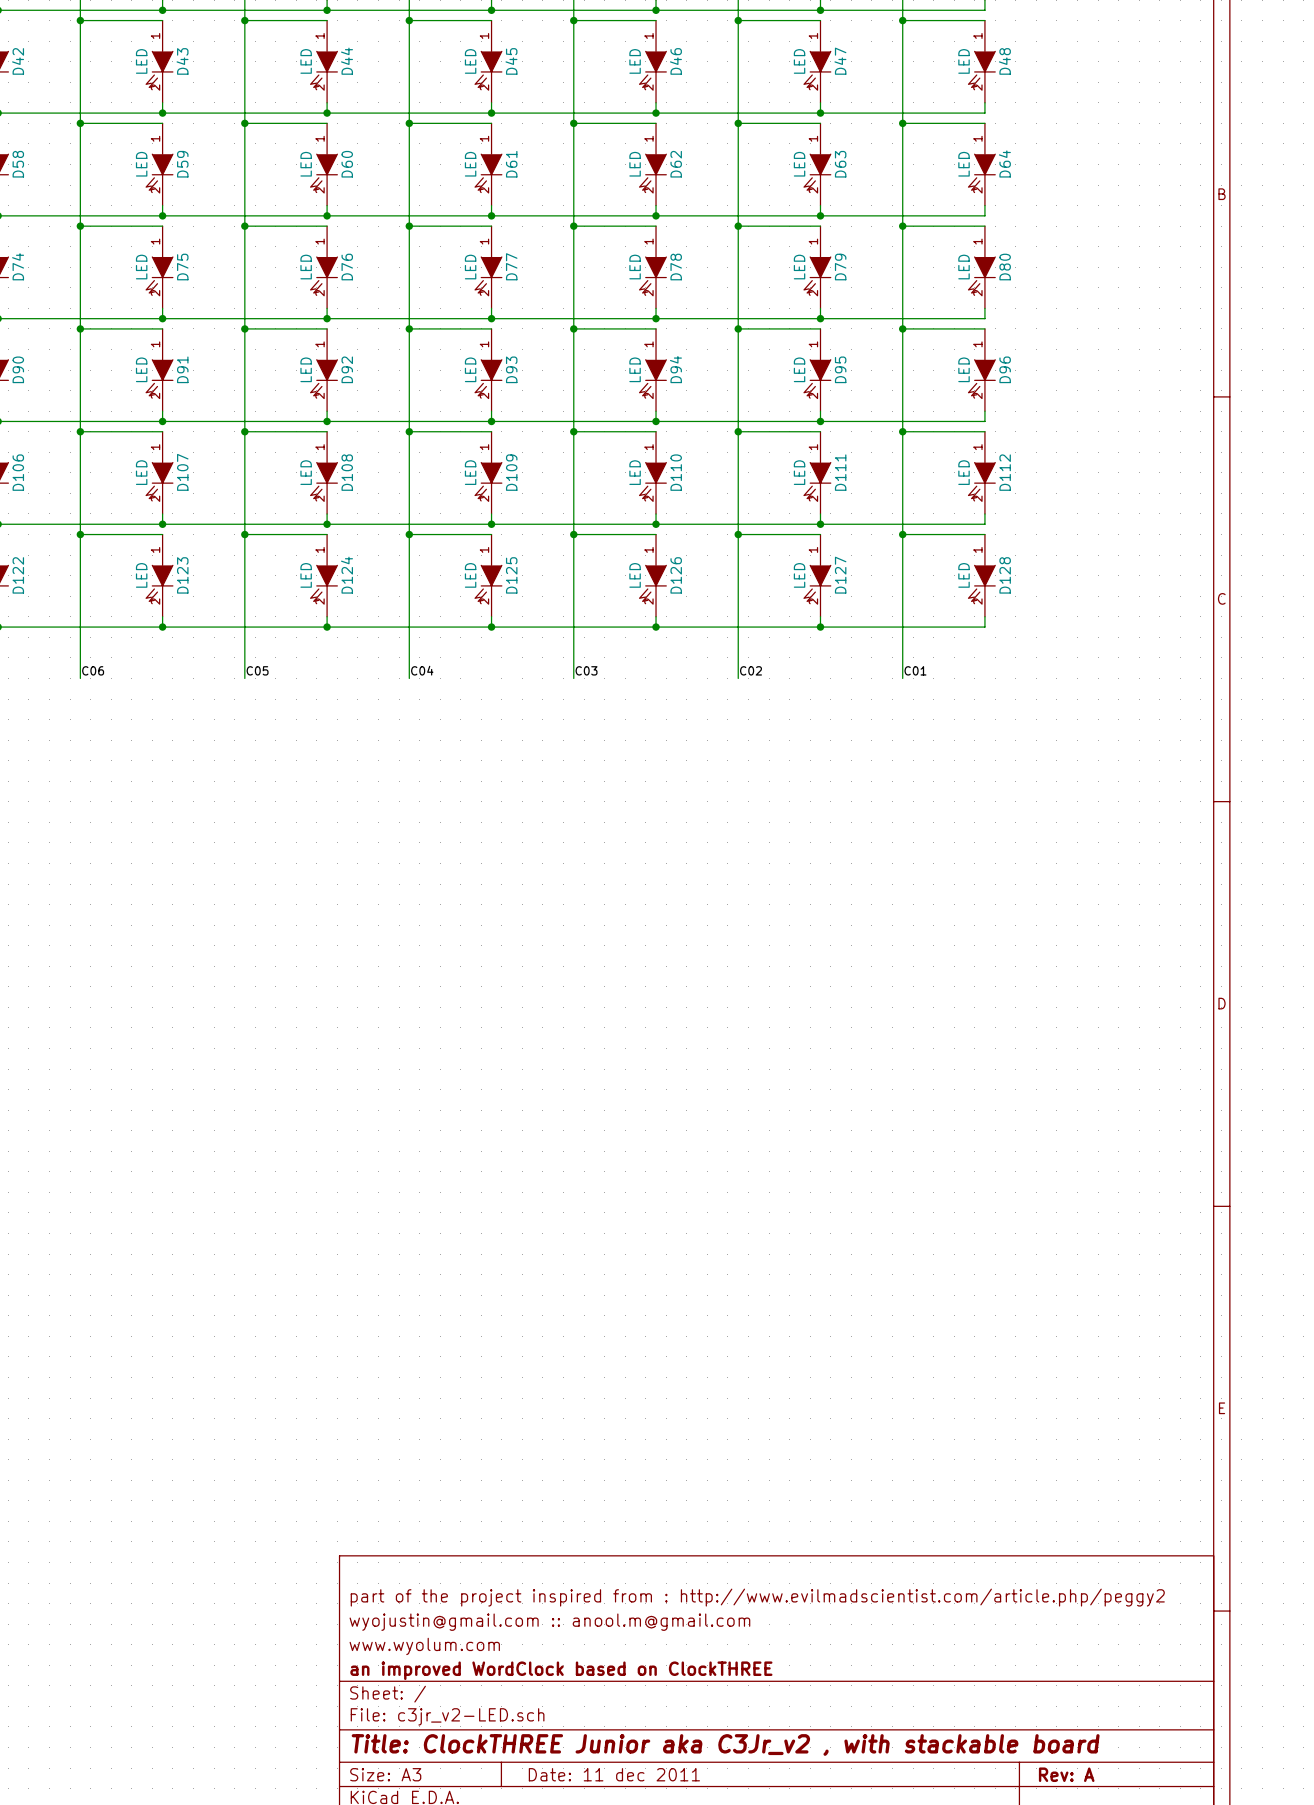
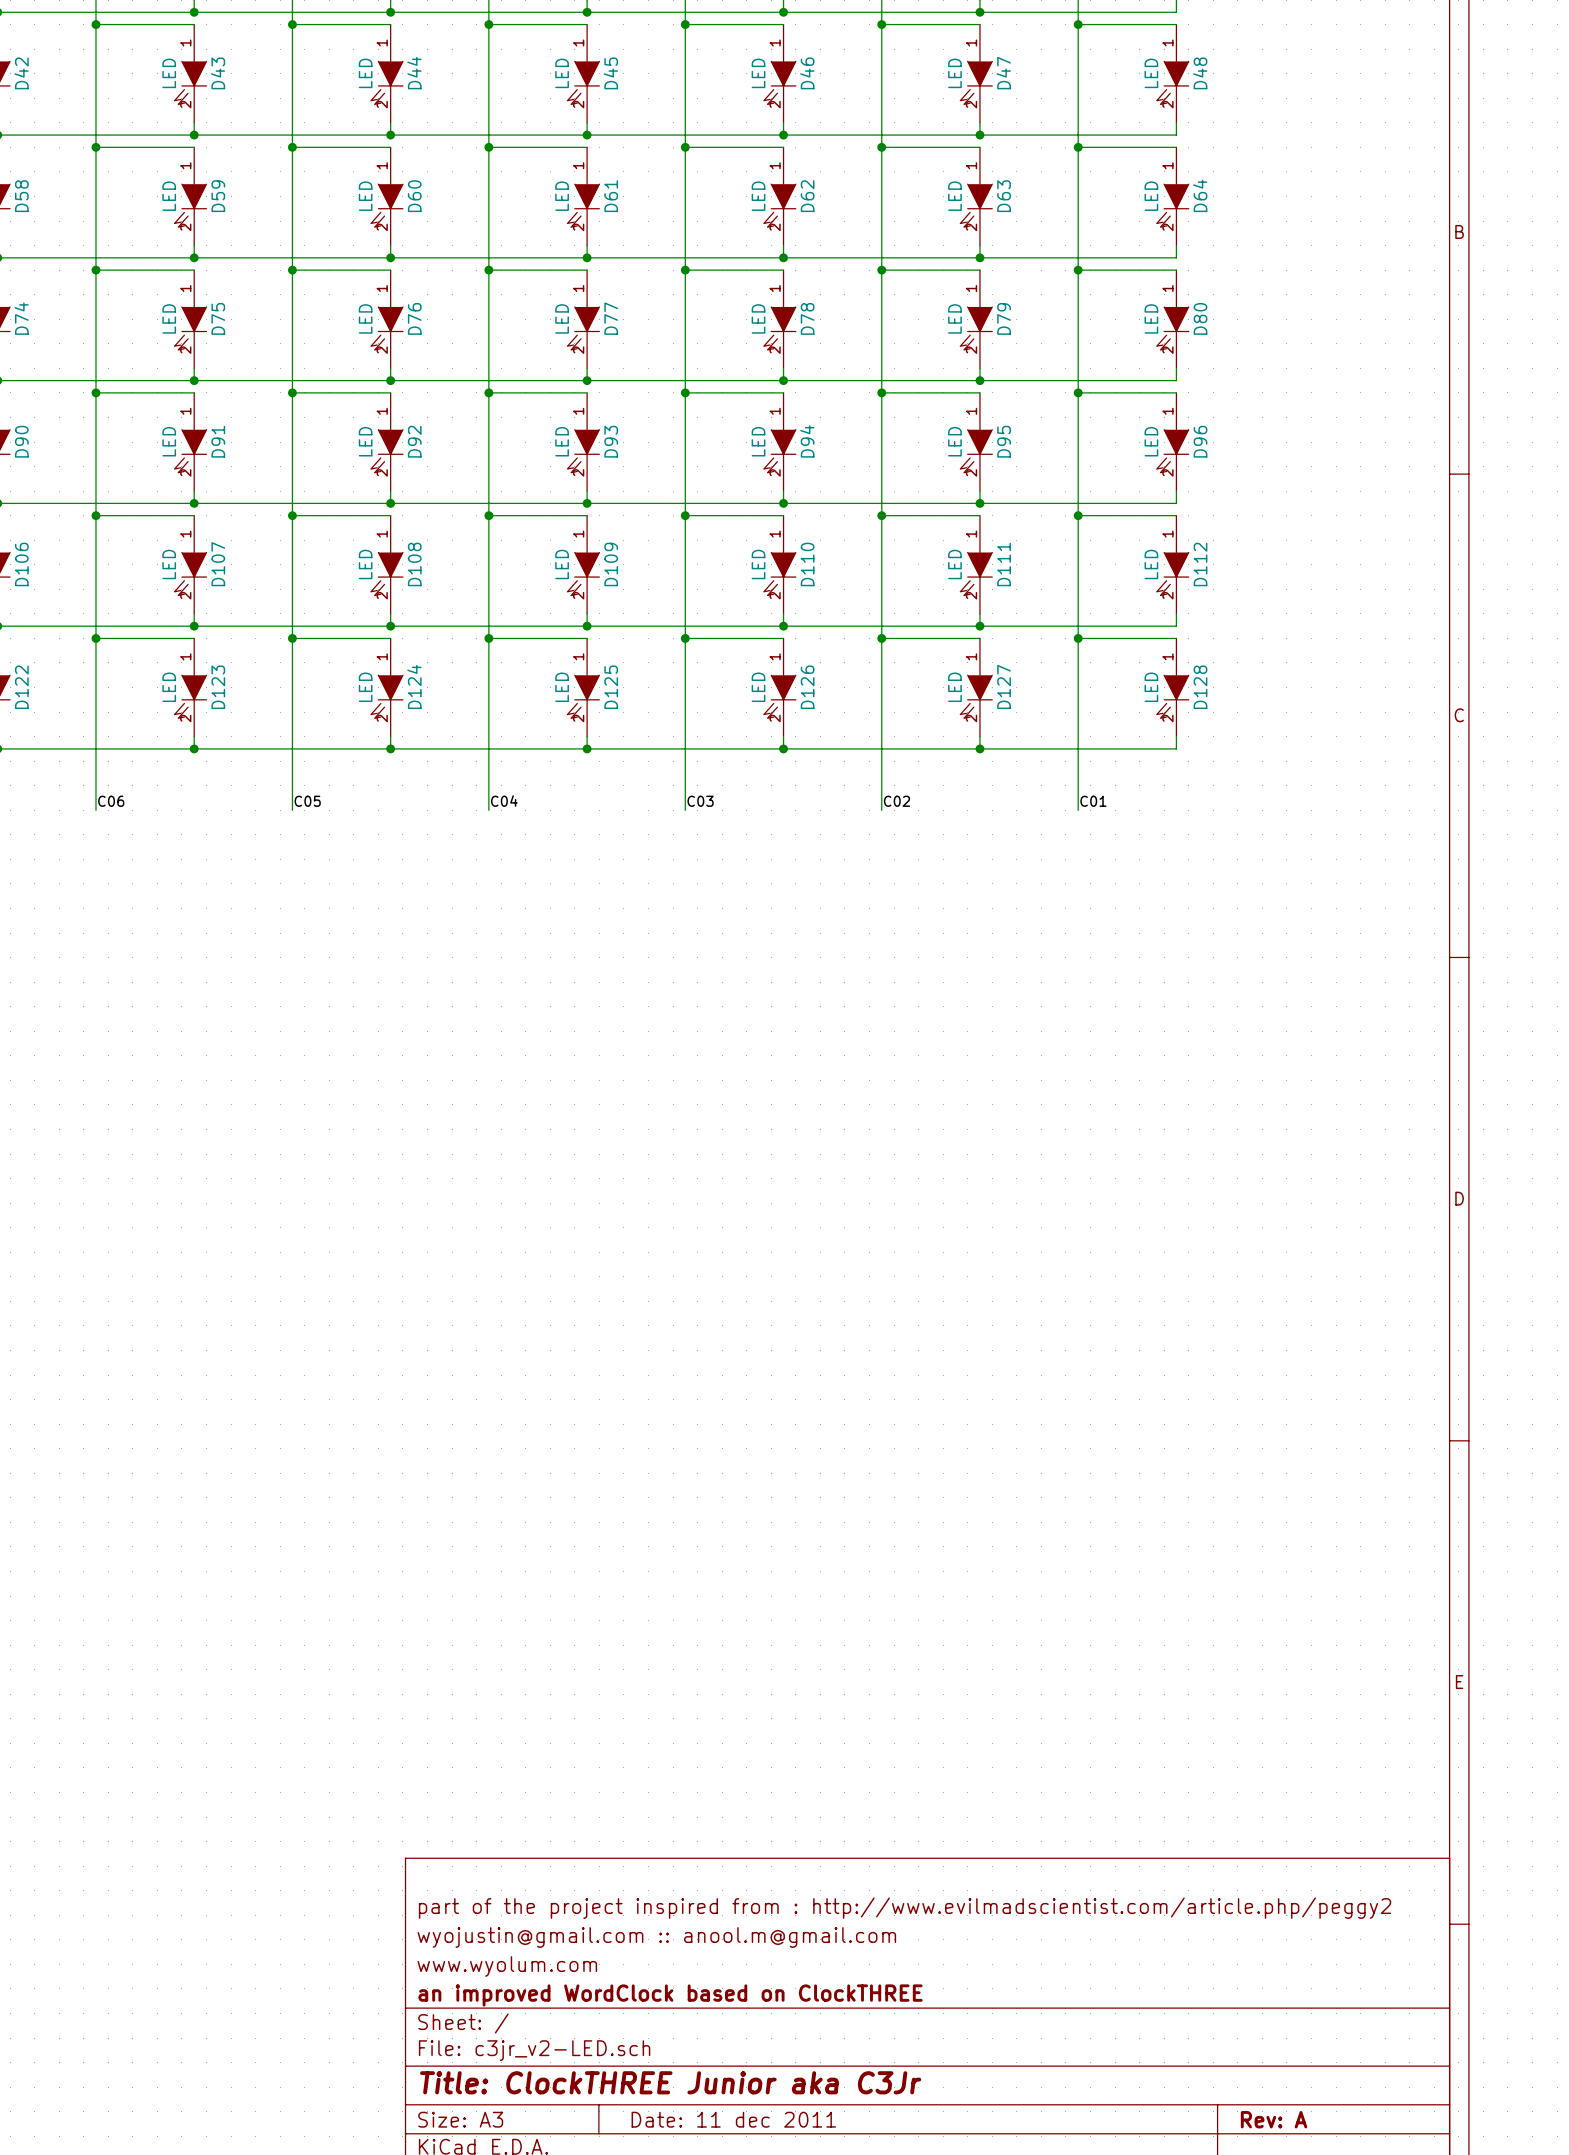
title block: Title: ClockTHREE Junior aka C3Jr_v2 , with stackable board (725, 1744) -> Title: ClockTHREE Junior aka C3Jr (670, 2082)

